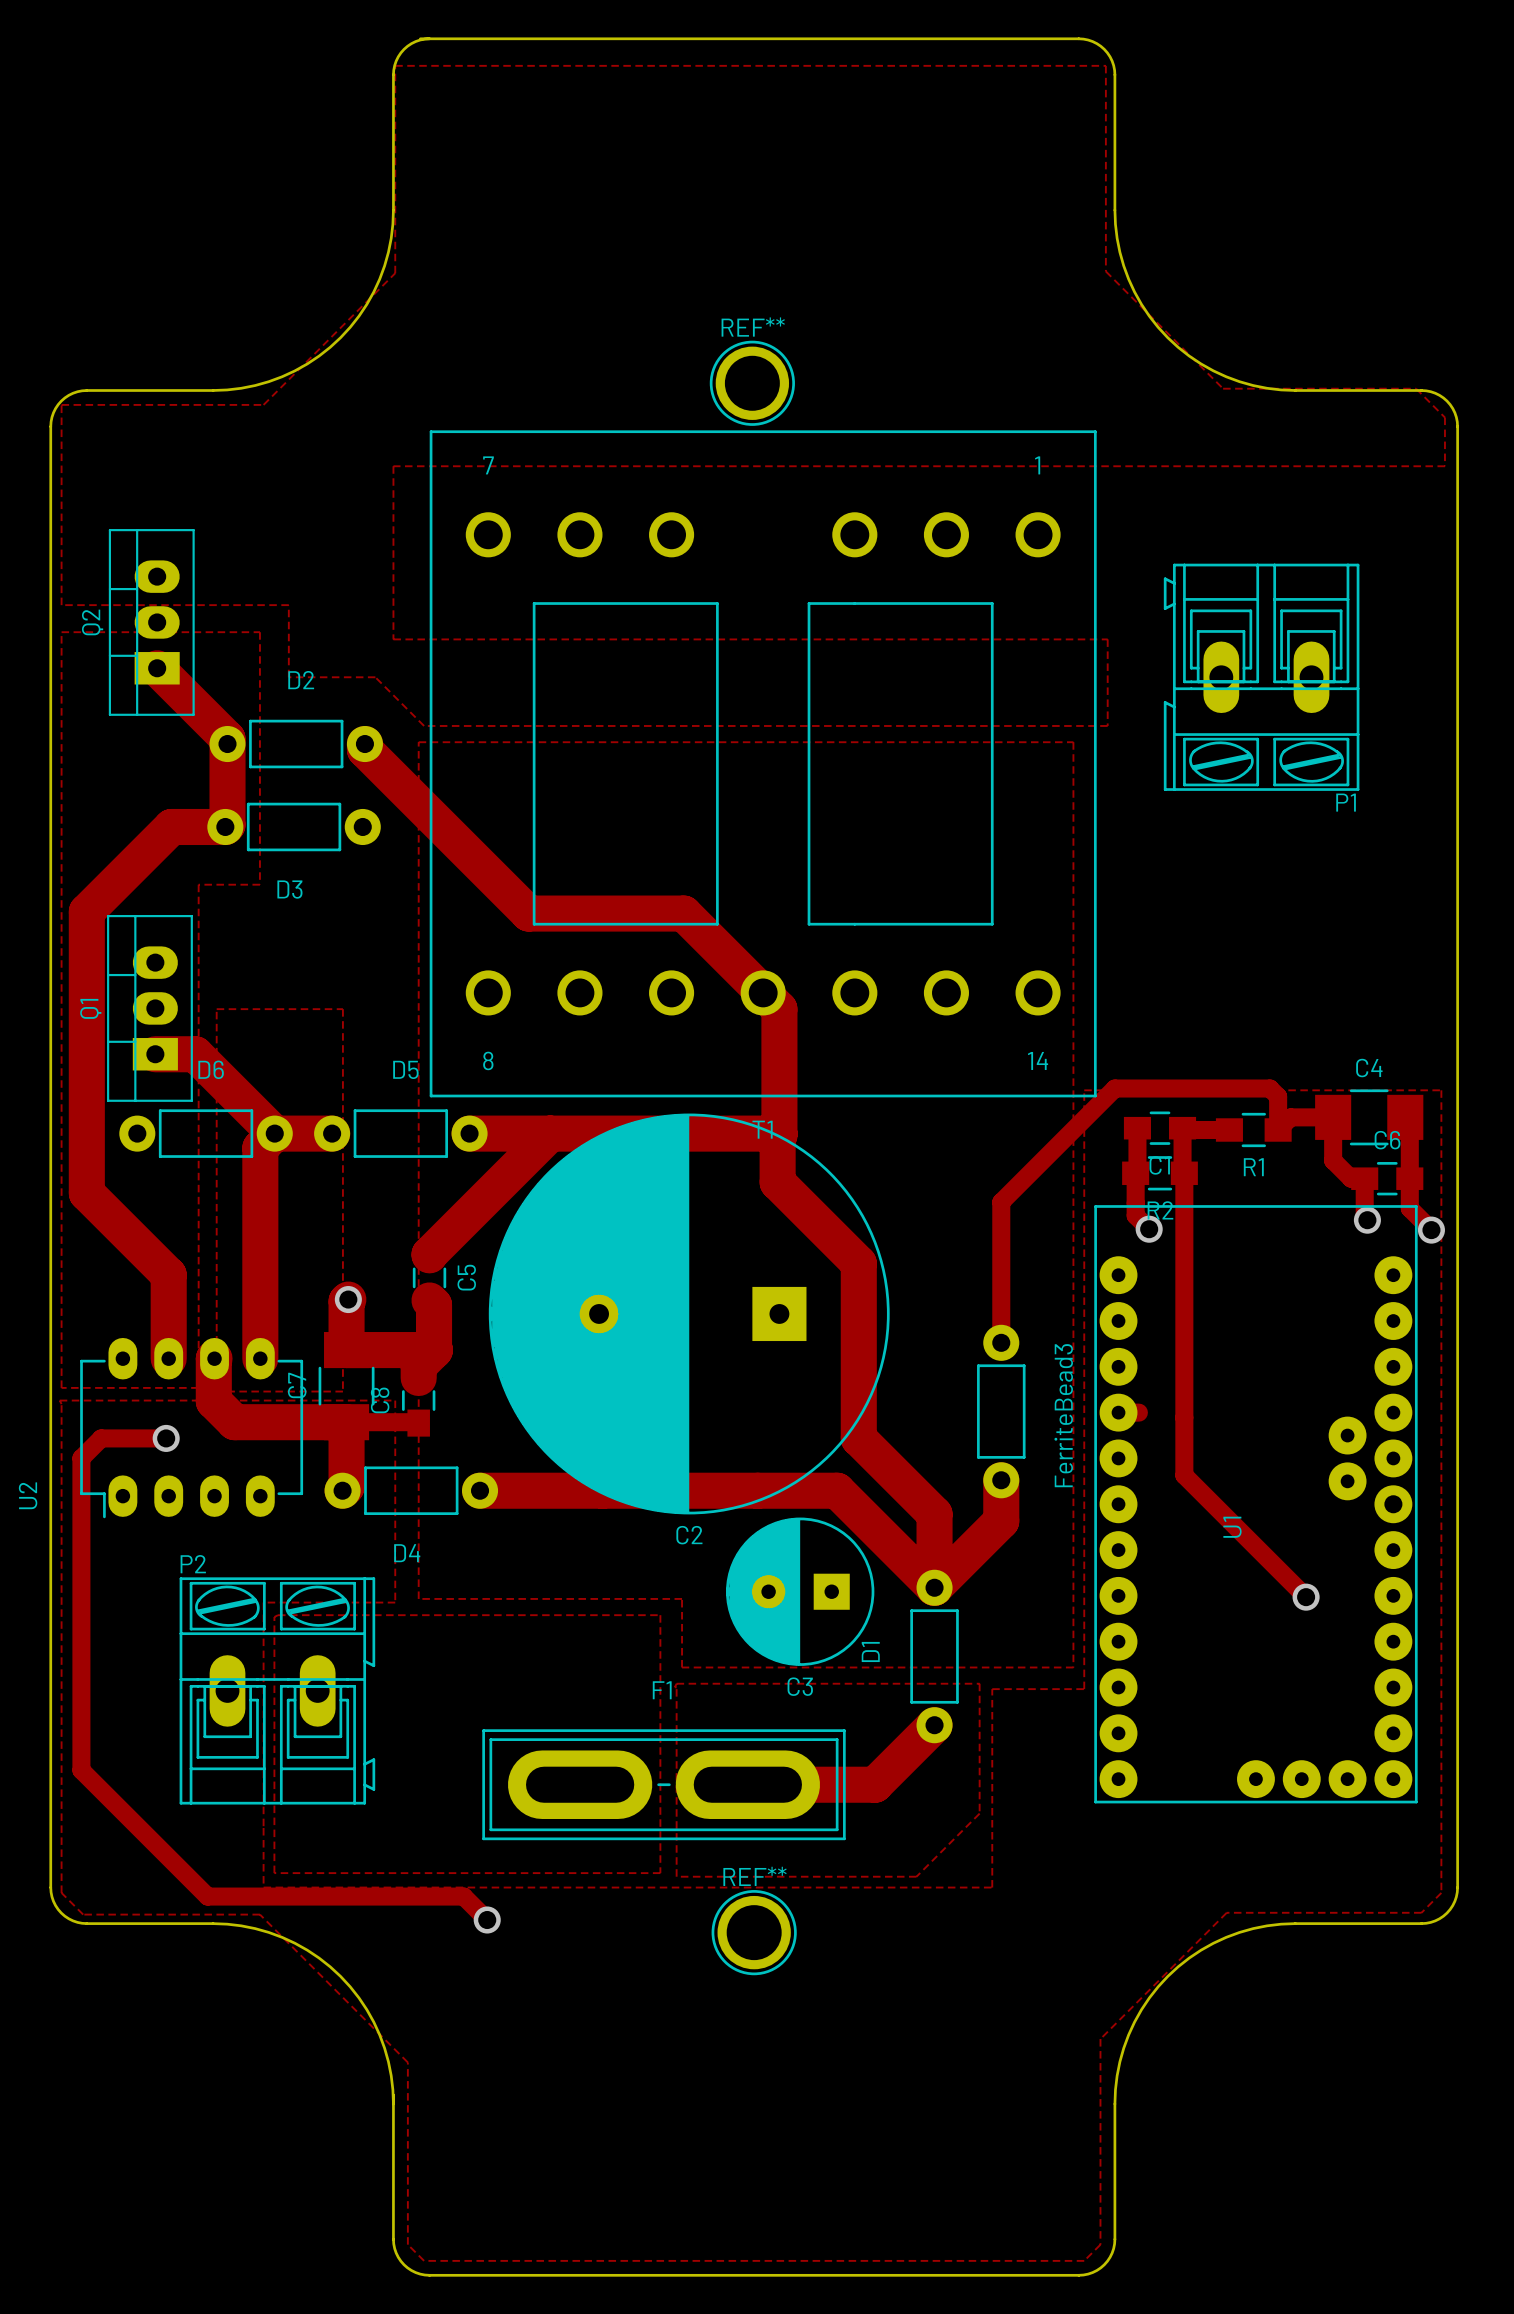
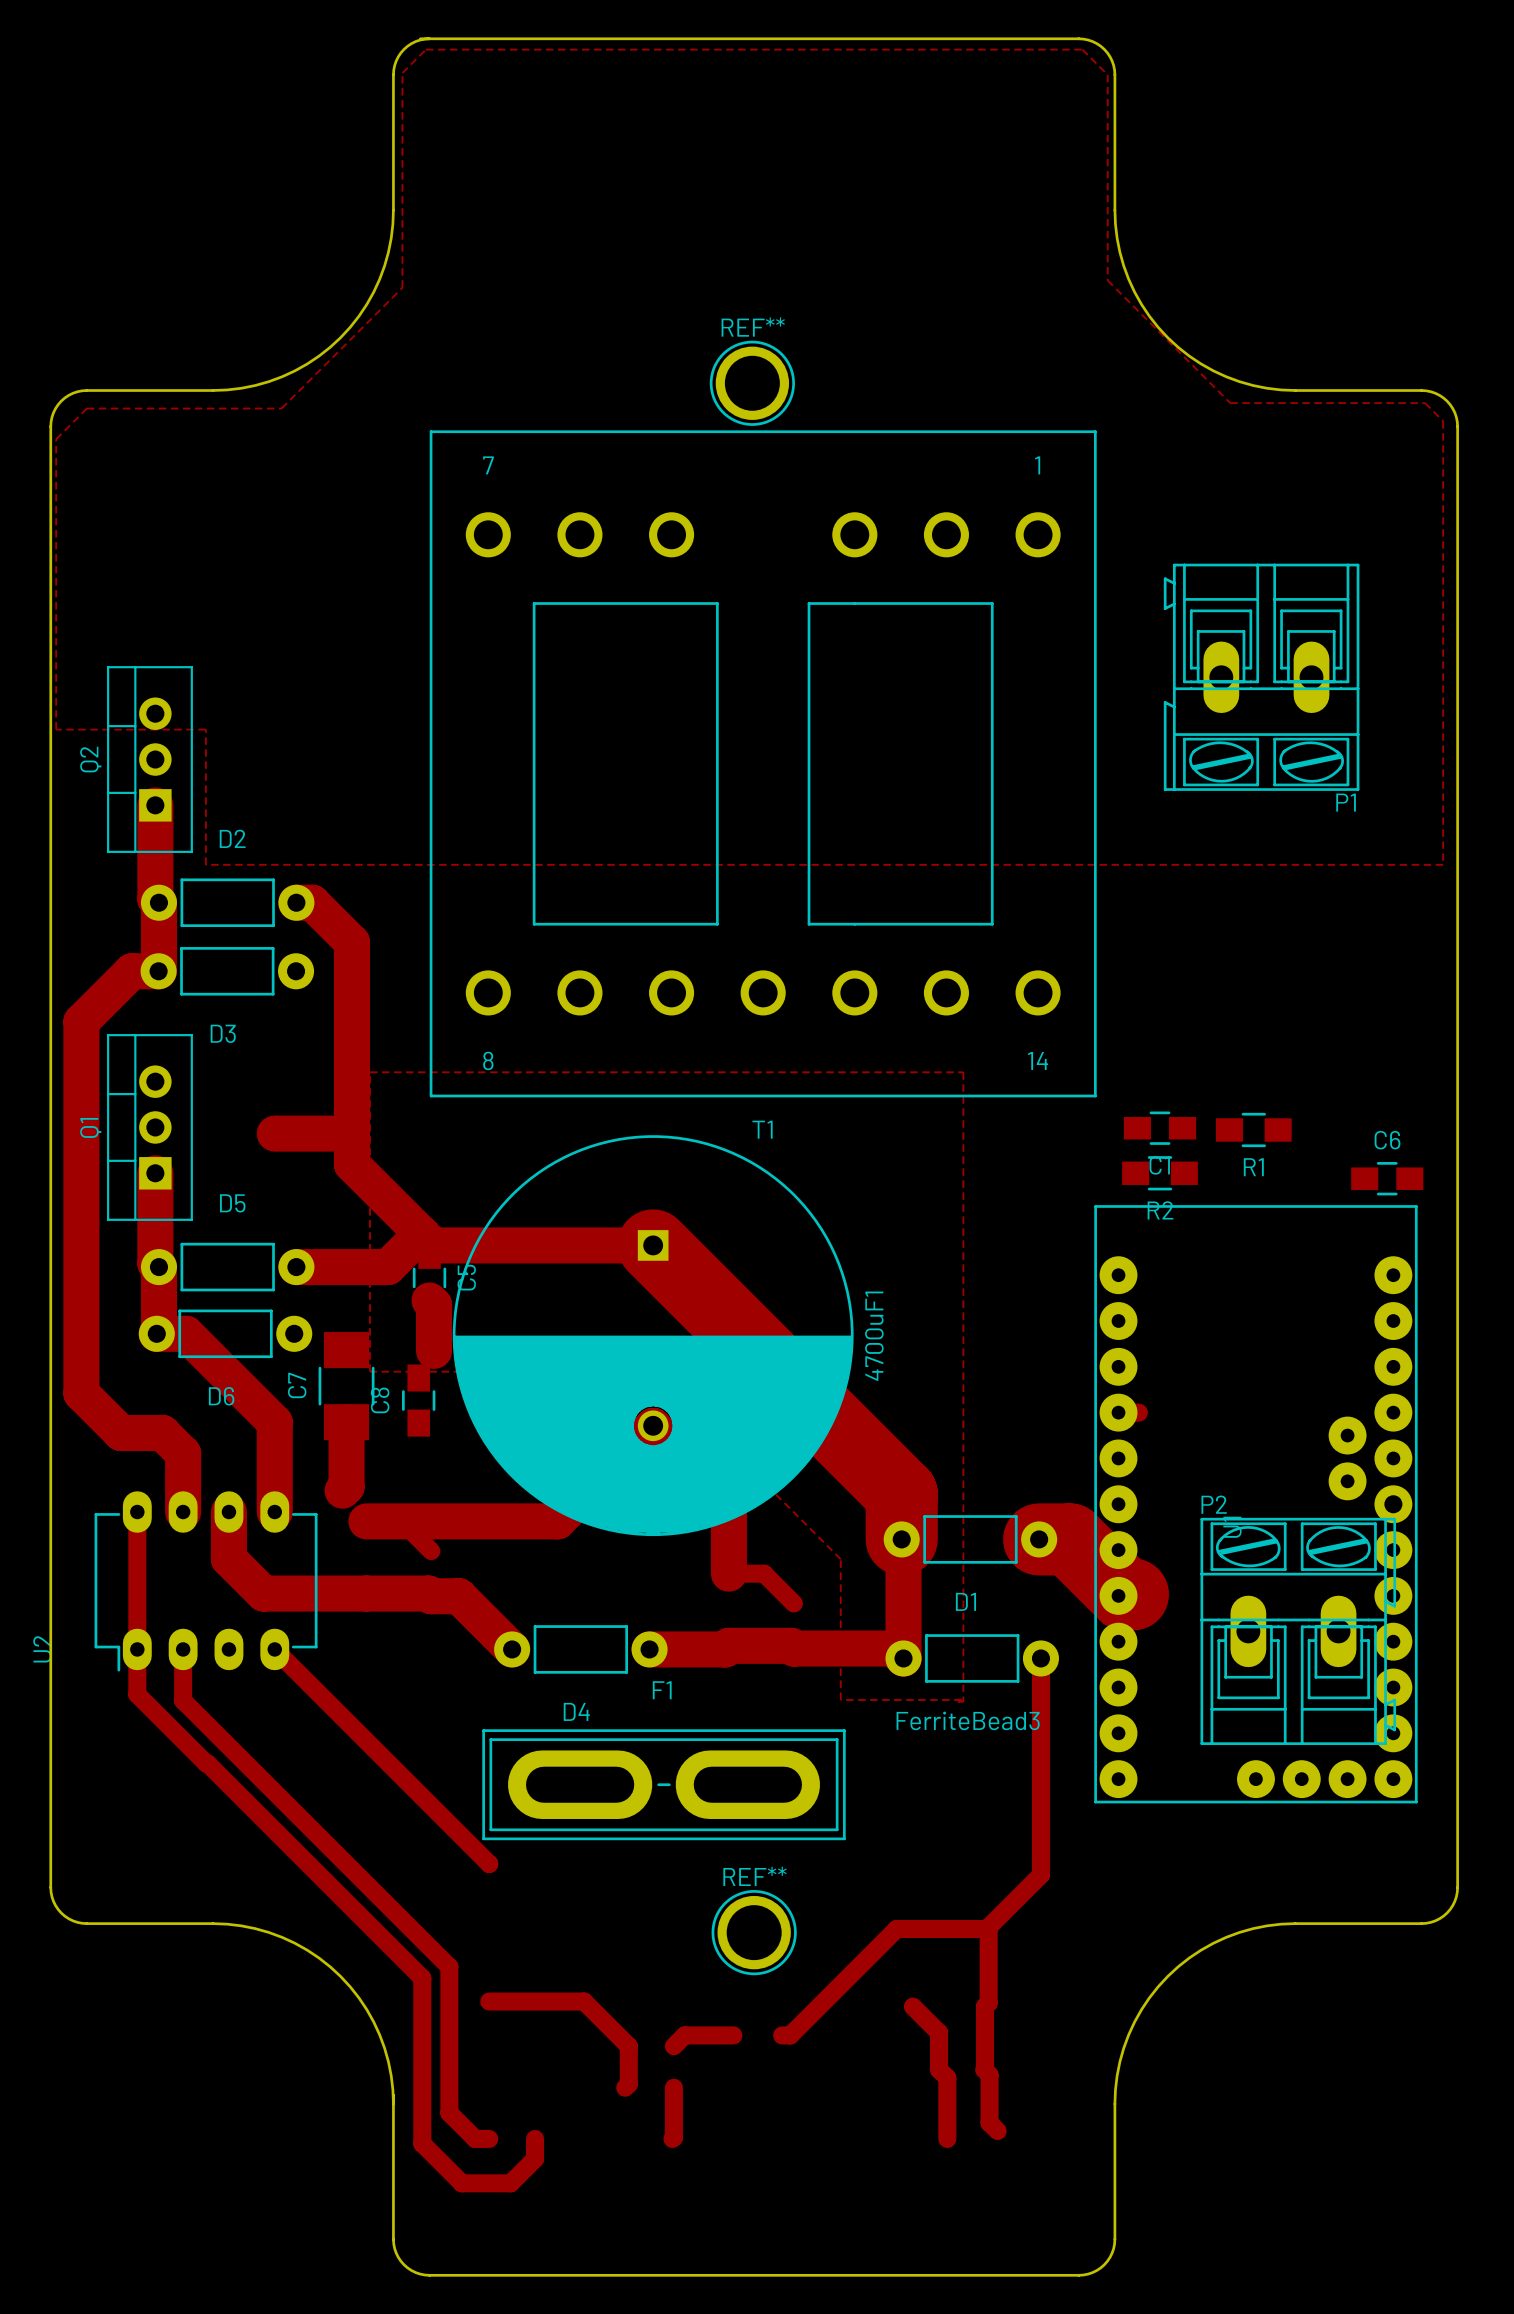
zone outline: (395, 65) (395, 273) (263, 404) (61, 404) (61, 605) (288, 605) (288, 677) (375, 677) (424, 725) (1107, 725) (1107, 639) (393, 639) (393, 466) (1444, 466) (1444, 417) (1416, 388) (1223, 388) (1105, 271) (1105, 65) (395, 65) -> (425, 49) (402, 73) (402, 287) (281, 408) (86, 408) (56, 439) (56, 729) (205, 729) (205, 864) (1443, 864) (1443, 421) (1425, 403) (1230, 403) (1107, 280) (1107, 74) (1082, 49) (425, 49)
Q2 footprint: [108, 529, 195, 716] -> [107, 666, 193, 853]
zone outline: (61, 632) (61, 1387) (198, 1387) (198, 884) (259, 884) (259, 632) (61, 632) -> none
track: (157, 668) (227, 738) (227, 824) (225, 826) (171, 826) (86, 911) (86, 1193) (168, 1275) (168, 1358) -> none
zone outline: (418, 742) (418, 1598) (682, 1598) (682, 1667) (1073, 1667) (1073, 742) (418, 742) -> none
D2 position: (296, 744) -> (227, 902)
track: (364, 744) (364, 749) (528, 913) (683, 913) (779, 1009) (779, 1135) (777, 1135) (779, 1133) (469, 1133) -> none
track: none -> (155, 805) (155, 899) (158, 902) (158, 970) (131, 971) (81, 1021) (81, 1393) (121, 1433) (162, 1433) (183, 1453) (183, 1512)
D3 position: (294, 826) -> (227, 971)
track: none -> (296, 902) (312, 902) (351, 942) (351, 1164) (433, 1245) (653, 1245) (901, 1493) (903, 1658) (893, 1648) (793, 1648) (791, 1645) (728, 1645) (725, 1649) (649, 1649)
Q1 footprint: [107, 915, 193, 1102] -> [107, 1034, 193, 1221]
zone outline: (216, 1009) (216, 1391) (342, 1391) (342, 1009) (216, 1009) -> none
track: (155, 1054) (195, 1054) (274, 1133) (260, 1148) (260, 1358) -> none
D6 name position: D6 (211, 1069) -> D6 (221, 1396)
zone outline: none -> (370, 1072) (370, 1371) (653, 1371) (840, 1559) (840, 1699) (961, 1699) (957, 1701) (963, 1701) (963, 1072) (370, 1072)
zone outline: (1084, 1090) (1084, 1689) (992, 1689) (992, 1887) (263, 1887) (263, 1602) (395, 1602) (395, 1400) (59, 1400) (61, 1404) (61, 1892) (83, 1914) (259, 1914) (407, 2062) (407, 2244) (424, 2260) (1084, 2260) (1100, 2244) (1100, 2039) (1226, 1912) (1421, 1912) (1441, 1892) (1441, 1090) (1084, 1090) -> none
C4: (1369, 1117) -> none
track: (1405, 1117) (1409, 1121) (1409, 1208) (1432, 1231) -> none
track: (1137, 1128) (1135, 1215) (1149, 1229) -> none
track: (1229, 1130) (1184, 1130) (1182, 1128) (1182, 1171) (1184, 1173) (1184, 1475) (1306, 1597) -> none
D6 position: (206, 1133) -> (225, 1333)
D5 position: (400, 1133) -> (227, 1267)
track: (550, 1133) (429, 1255) -> none
track: (777, 1133) (777, 1182) (858, 1263) (858, 1438) (934, 1514) (934, 1587) -> none
track: none -> (155, 1173) (155, 1263) (158, 1267) (158, 1331) (156, 1333) (186, 1333) (274, 1422) (274, 1512)
track: (1367, 1220) (1364, 1217) (1364, 1178) (1351, 1178) (1333, 1160) (1333, 1117) (1290, 1117) (1278, 1130) (1278, 1096) (1270, 1088) (1114, 1088) (1001, 1202) (1001, 1342) -> none
via: (1367, 1220) -> none
via: (1149, 1229) -> none
via: (1431, 1230) -> none
track: none -> (421, 1233) (388, 1267) (296, 1267)
track: (348, 1299) (346, 1301) (346, 1350) (434, 1350) (418, 1366) (418, 1378) -> none
via: (348, 1299) -> none
C2: (689, 1313) -> none
4700uF1: none -> (653, 1335)
track: (214, 1358) (213, 1401) (234, 1422) (418, 1423) -> none
FerriteBead3 rotation: 0° (1001, 1411) -> 90° clockwise (972, 1658)
FerriteBead3 position: (1001, 1411) -> (972, 1658)
U2 position: (191, 1428) -> (206, 1581)
track: (166, 1438) (101, 1438) (81, 1458) (81, 1770) (207, 1896) (463, 1896) (487, 1920) -> none
via: (166, 1438) -> none
track: (1001, 1480) (1001, 1521) (934, 1587) -> none
D4 position: (411, 1490) -> (580, 1649)
track: (480, 1490) (837, 1490) (934, 1587) -> none
track: none -> (137, 1512) (137, 1694) (422, 1978) (422, 2143) (461, 2183) (510, 2183) (535, 2158) (535, 2138)
track: none -> (228, 1512) (228, 1558) (263, 1593) (428, 1593) (431, 1596) (458, 1596) (512, 1649)
track: none -> (1039, 1539) (1069, 1539) (1124, 1594) (1132, 1594)
track: none -> (431, 1551) (401, 1521) (366, 1521) (557, 1521) (653, 1425) (728, 1501) (728, 1573) (764, 1573) (793, 1603)
C3: (800, 1591) -> none
via: (1306, 1597) -> none
zone outline: (278, 1615) (660, 1615) (660, 1873) (274, 1873) (274, 1616) (278, 1615) -> none
track: none -> (183, 1649) (183, 1700) (449, 1966) (449, 2112) (475, 2138) (489, 2138)
track: none -> (274, 1649) (489, 1863)
D1 name position: D1 (870, 1651) -> D1 (965, 1601)
D1 rotation: 0° (934, 1656) -> 90° clockwise (970, 1539)
D1 position: (934, 1656) -> (970, 1539)
track: none -> (1040, 1658) (1040, 1874) (987, 1928)
zone outline: (676, 1683) (979, 1683) (979, 1813) (916, 1876) (676, 1876) (676, 1687) (674, 1687) (676, 1683) -> none
P2 position: (277, 1690) -> (1298, 1631)
track: (934, 1725) (875, 1784) (747, 1784) -> none
via: (487, 1920) -> none
track: none -> (988, 1927) (988, 2002) (985, 2006) (984, 2069)
track: none -> (988, 1929) (896, 1929) (790, 2035) (782, 2035)
track: none -> (489, 2001) (584, 2001) (628, 2046) (628, 2084) (625, 2087)
track: none -> (912, 2006) (939, 2032) (939, 2069) (947, 2078) (947, 2138)
track: none -> (733, 2035) (684, 2035) (673, 2046)
track: none -> (987, 2073) (989, 2075) (989, 2122) (997, 2131)
track: none -> (673, 2087) (672, 2138)

